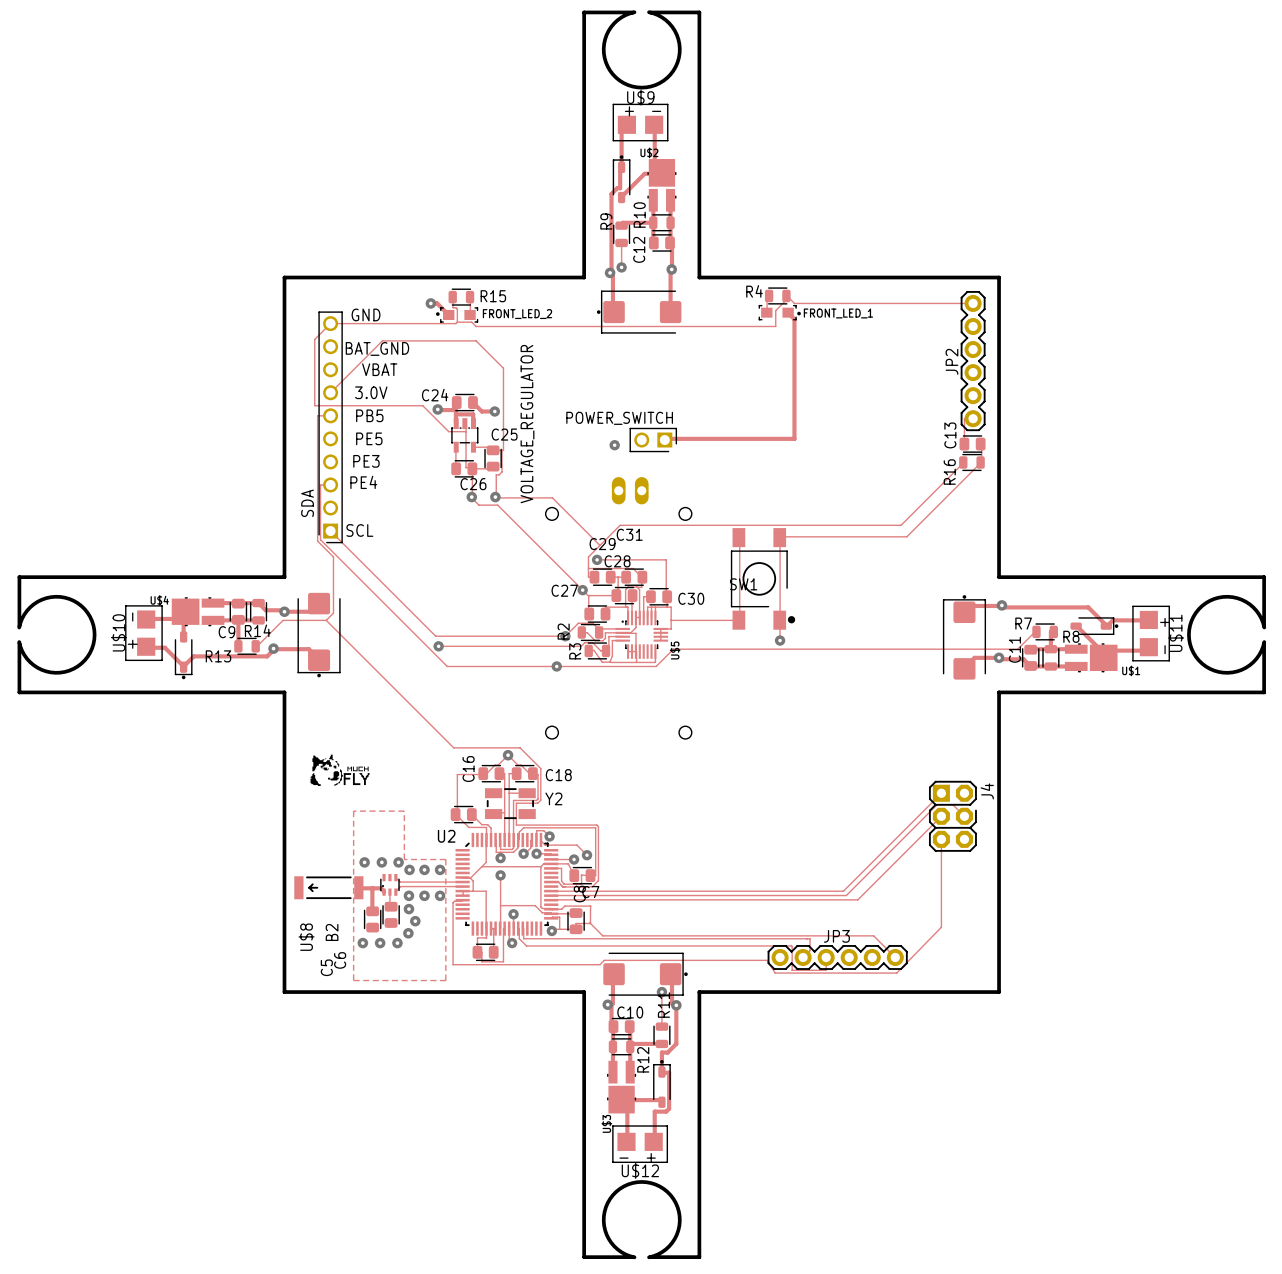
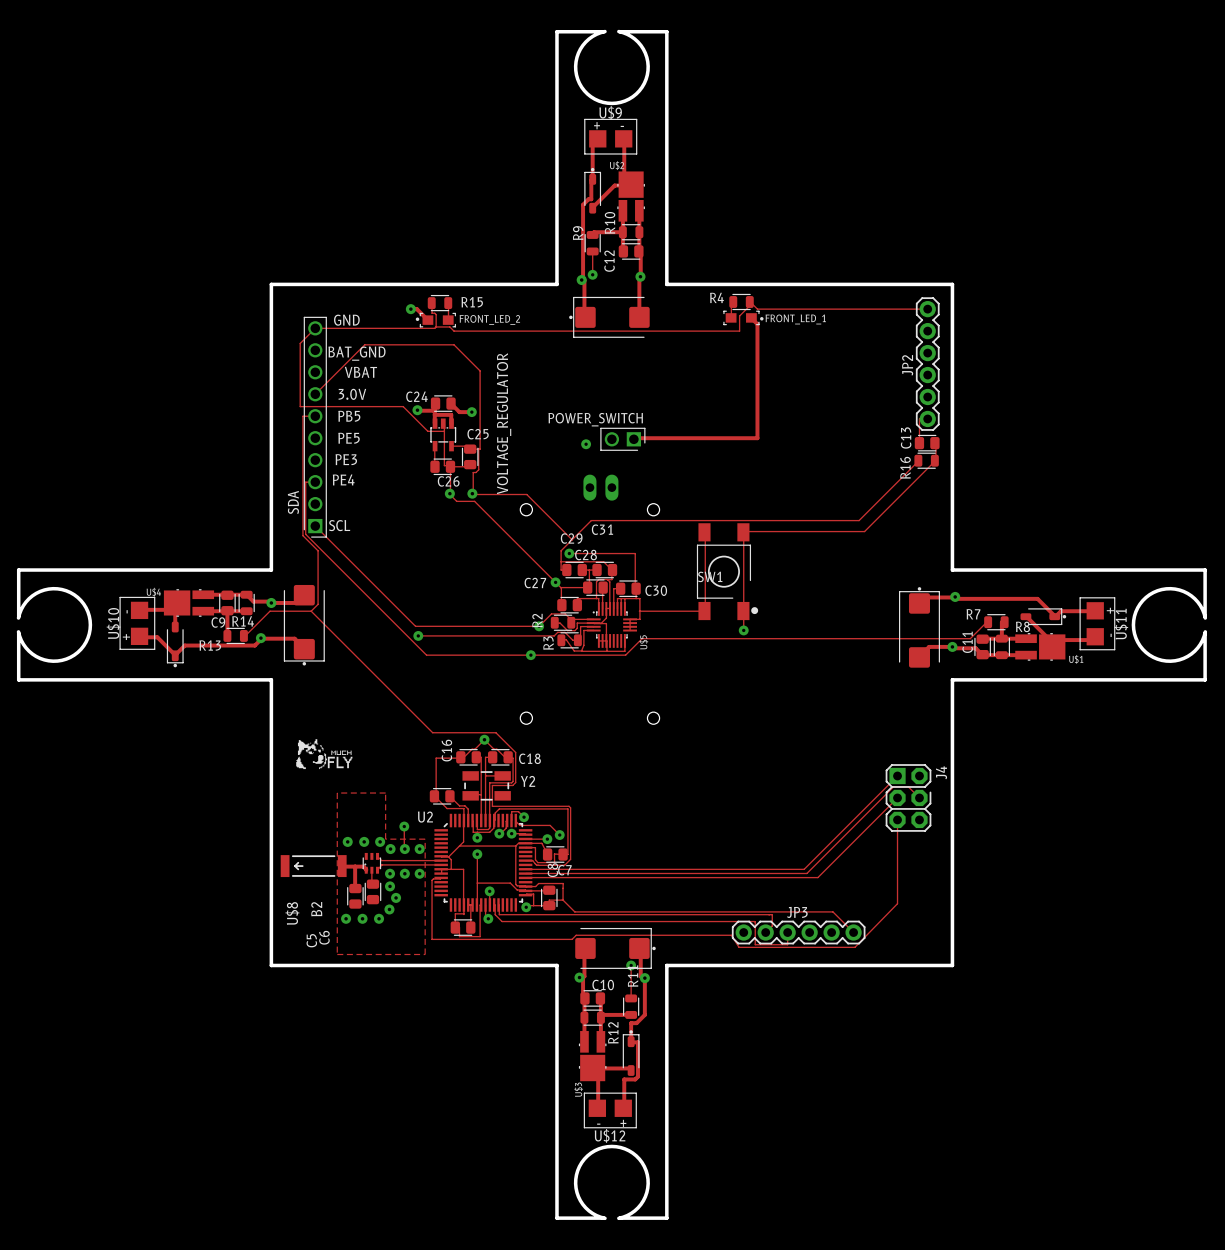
track: none -> (404, 826) (404, 849)
via: none -> (404, 826)

